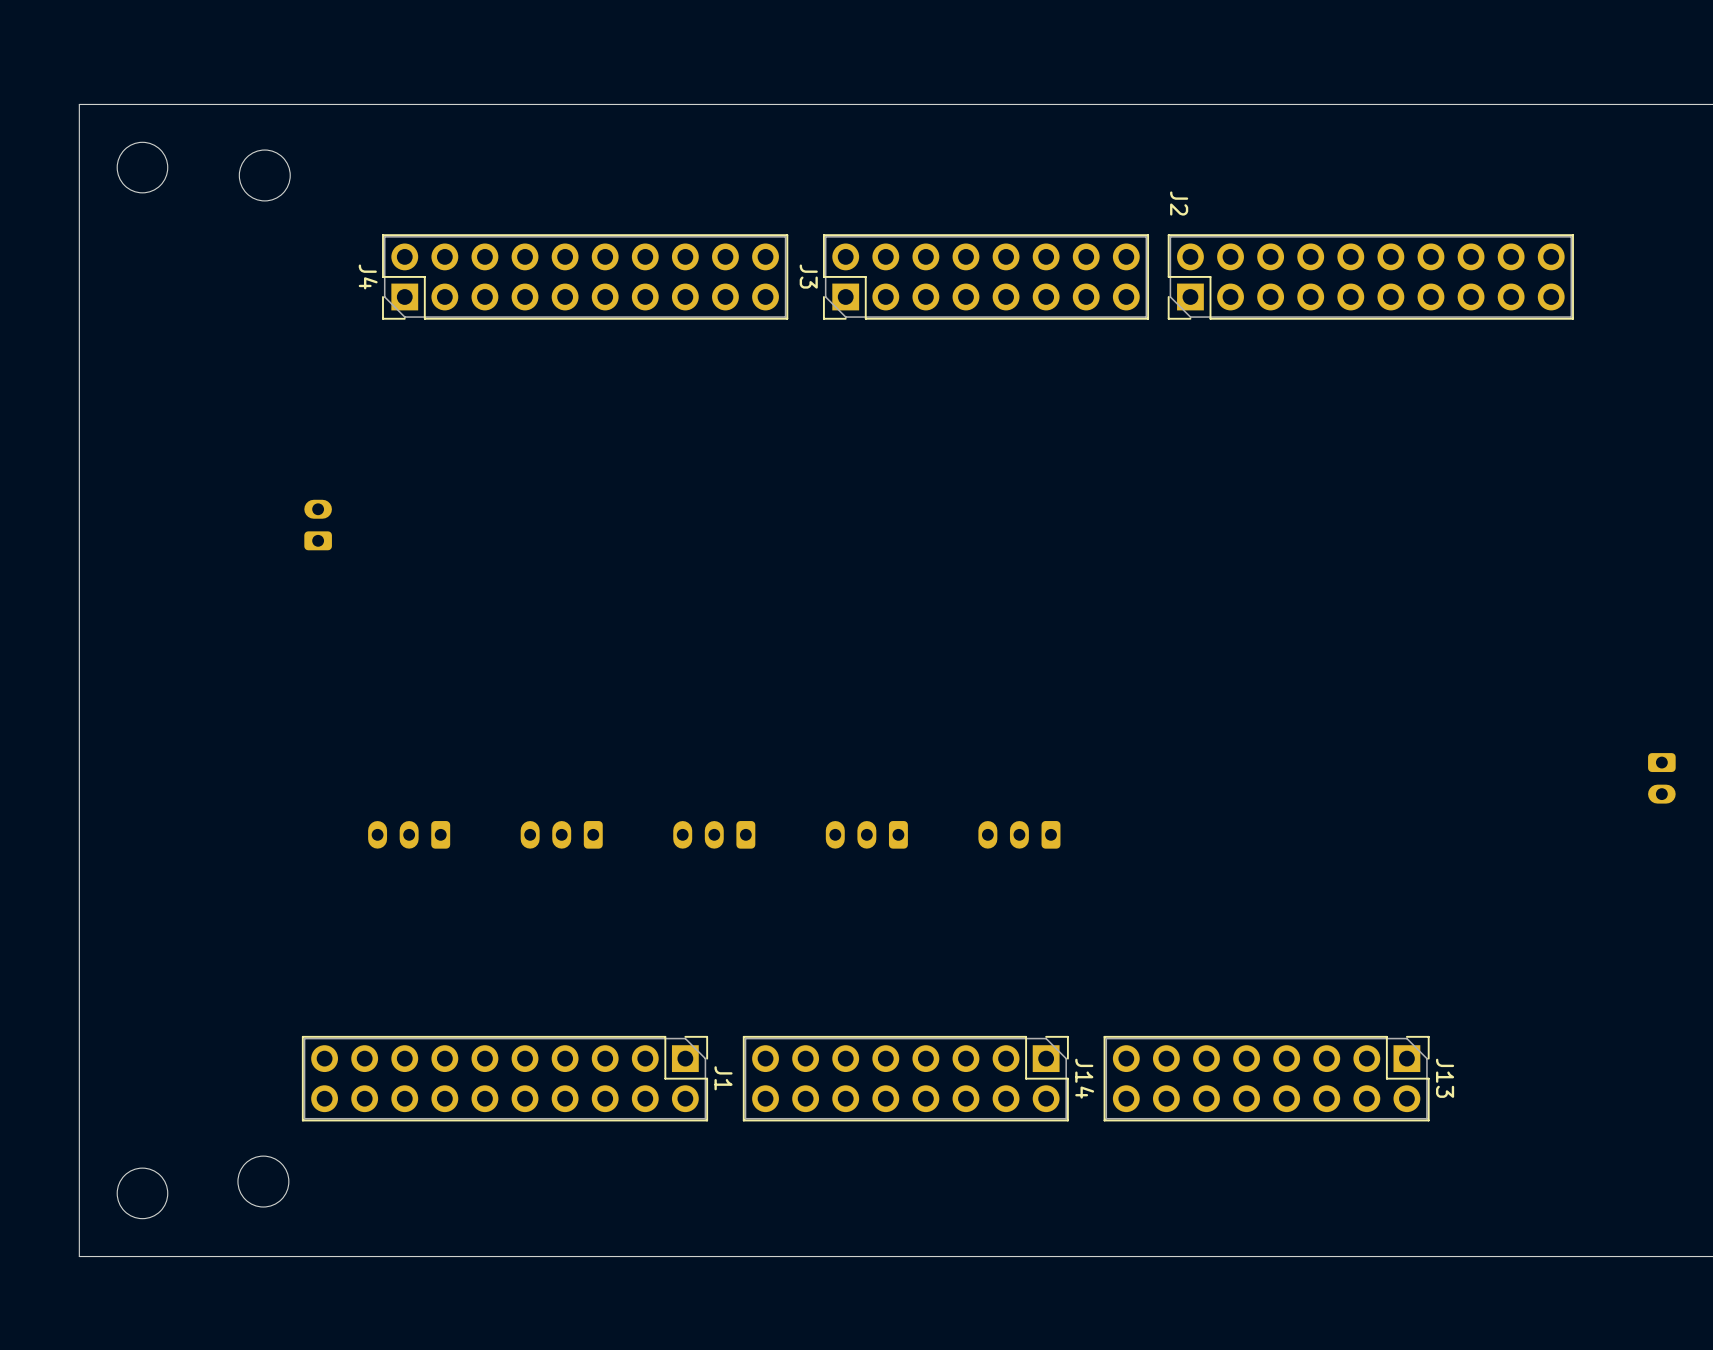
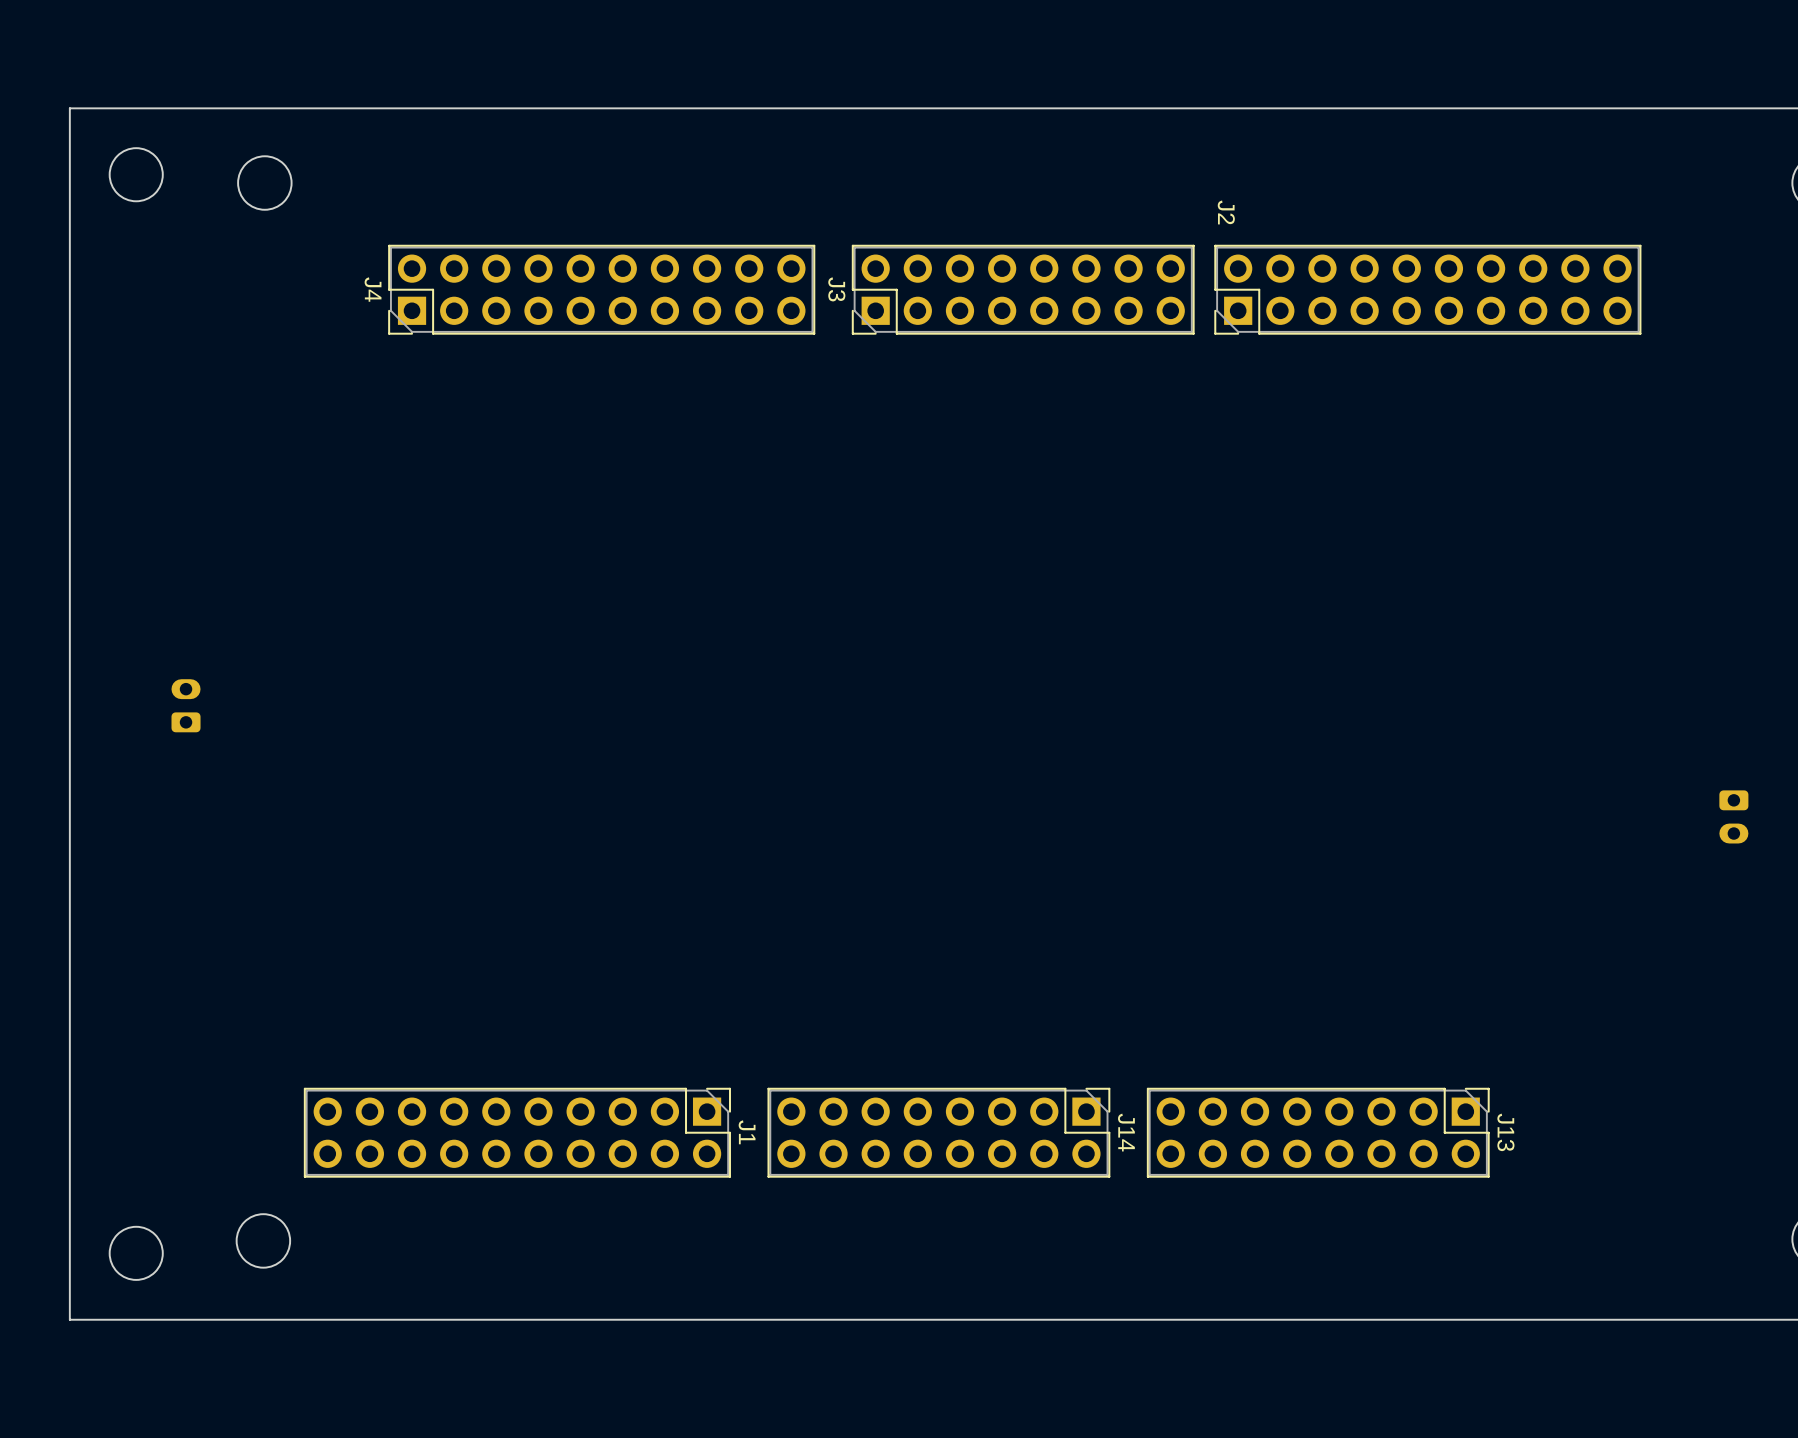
part position: (318, 525) -> (186, 705)
part: (409, 834) -> none
part: (561, 834) -> none
part: (714, 834) -> none
part: (866, 834) -> none
part: (1019, 834) -> none

